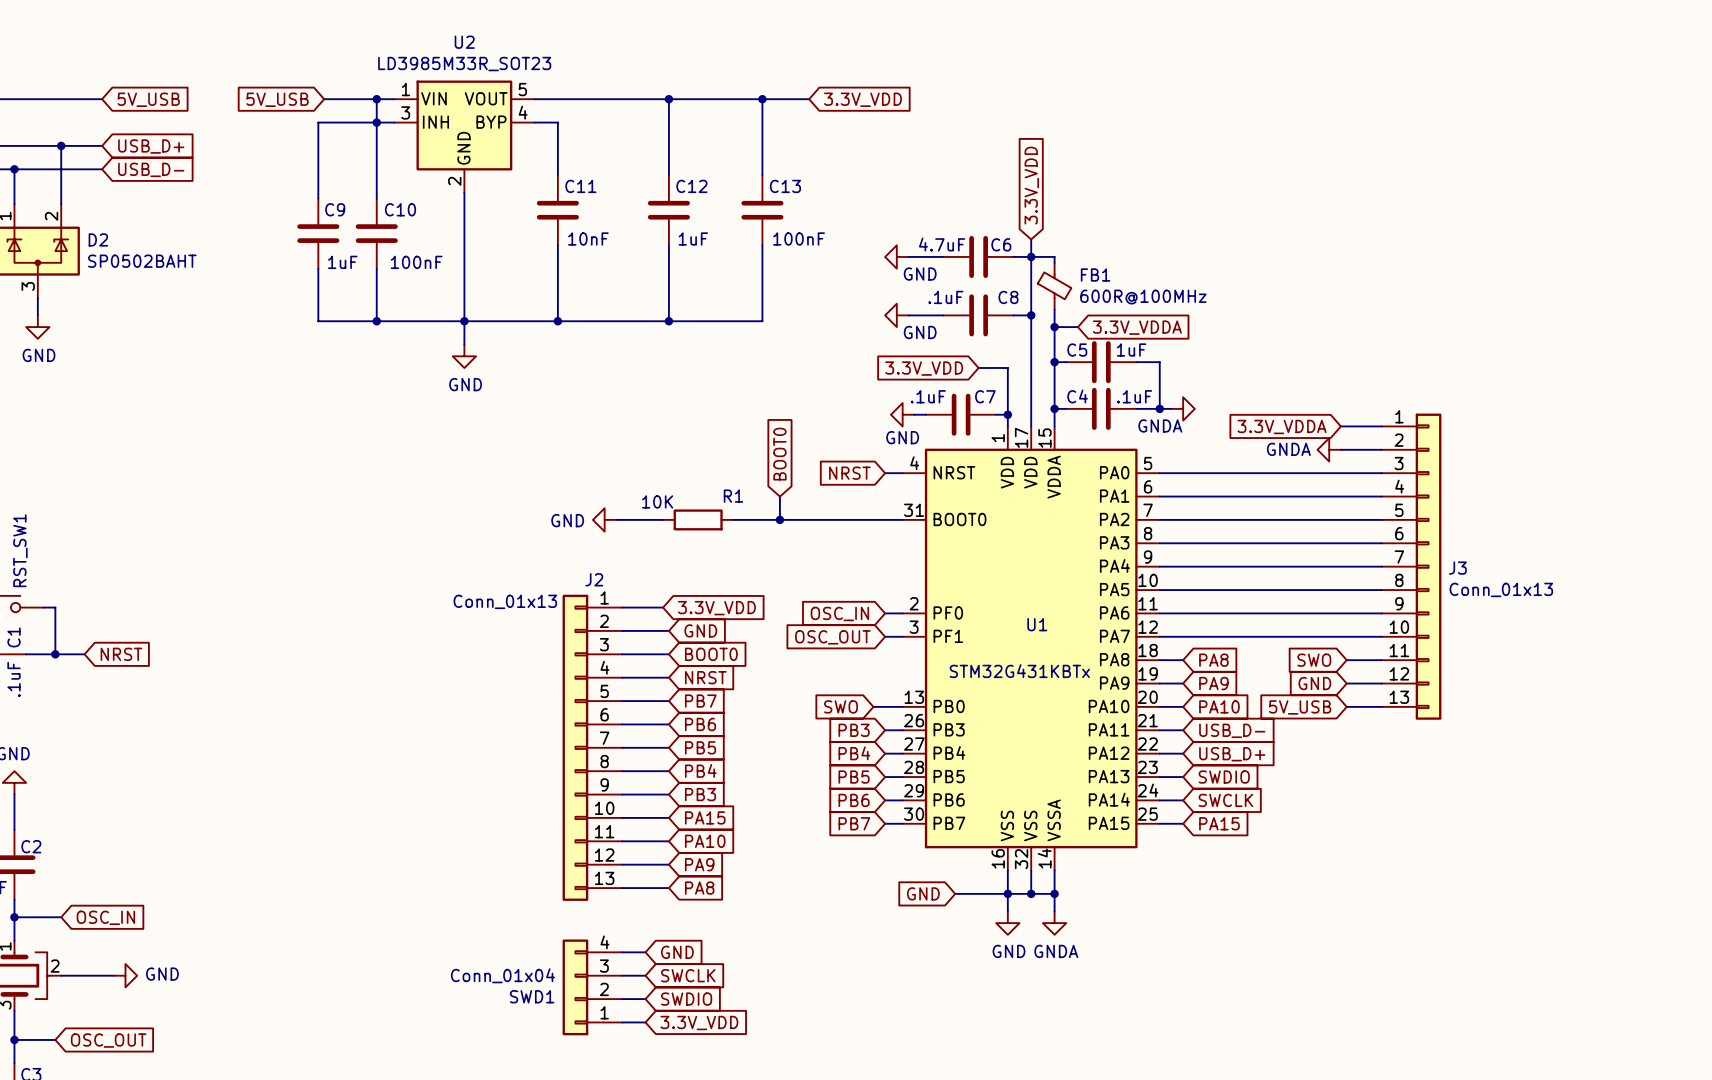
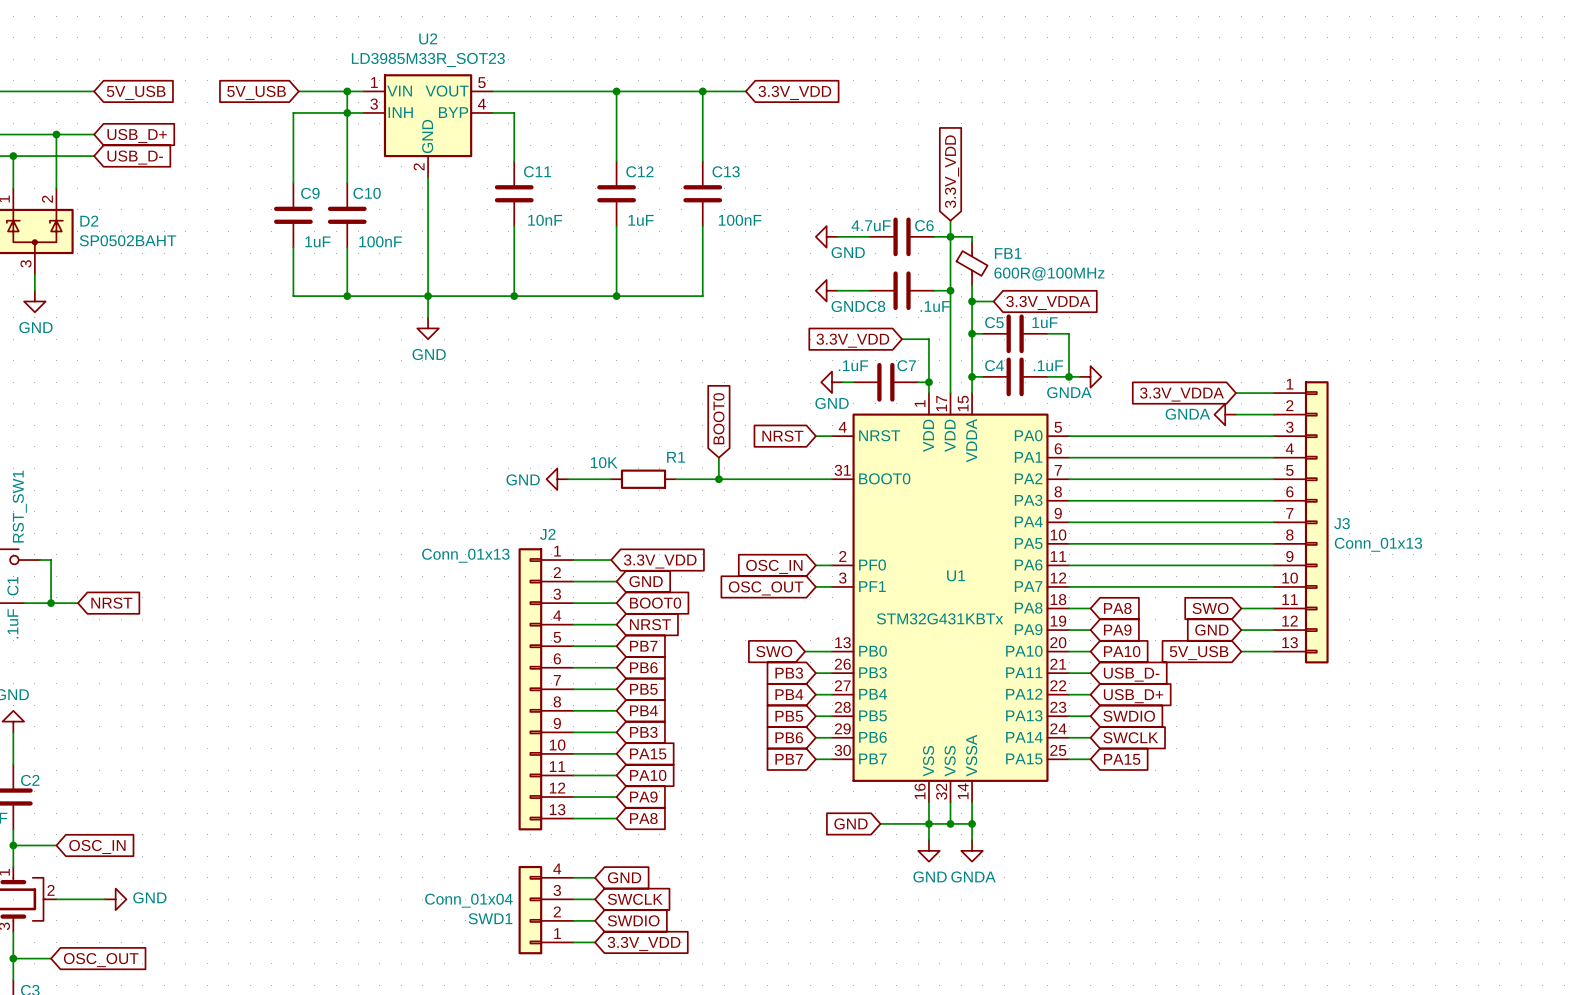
C8 value position: .1uF (945, 297) -> .1uF (935, 306)
C8 name position: C8 (1008, 297) -> C8 (875, 306)

